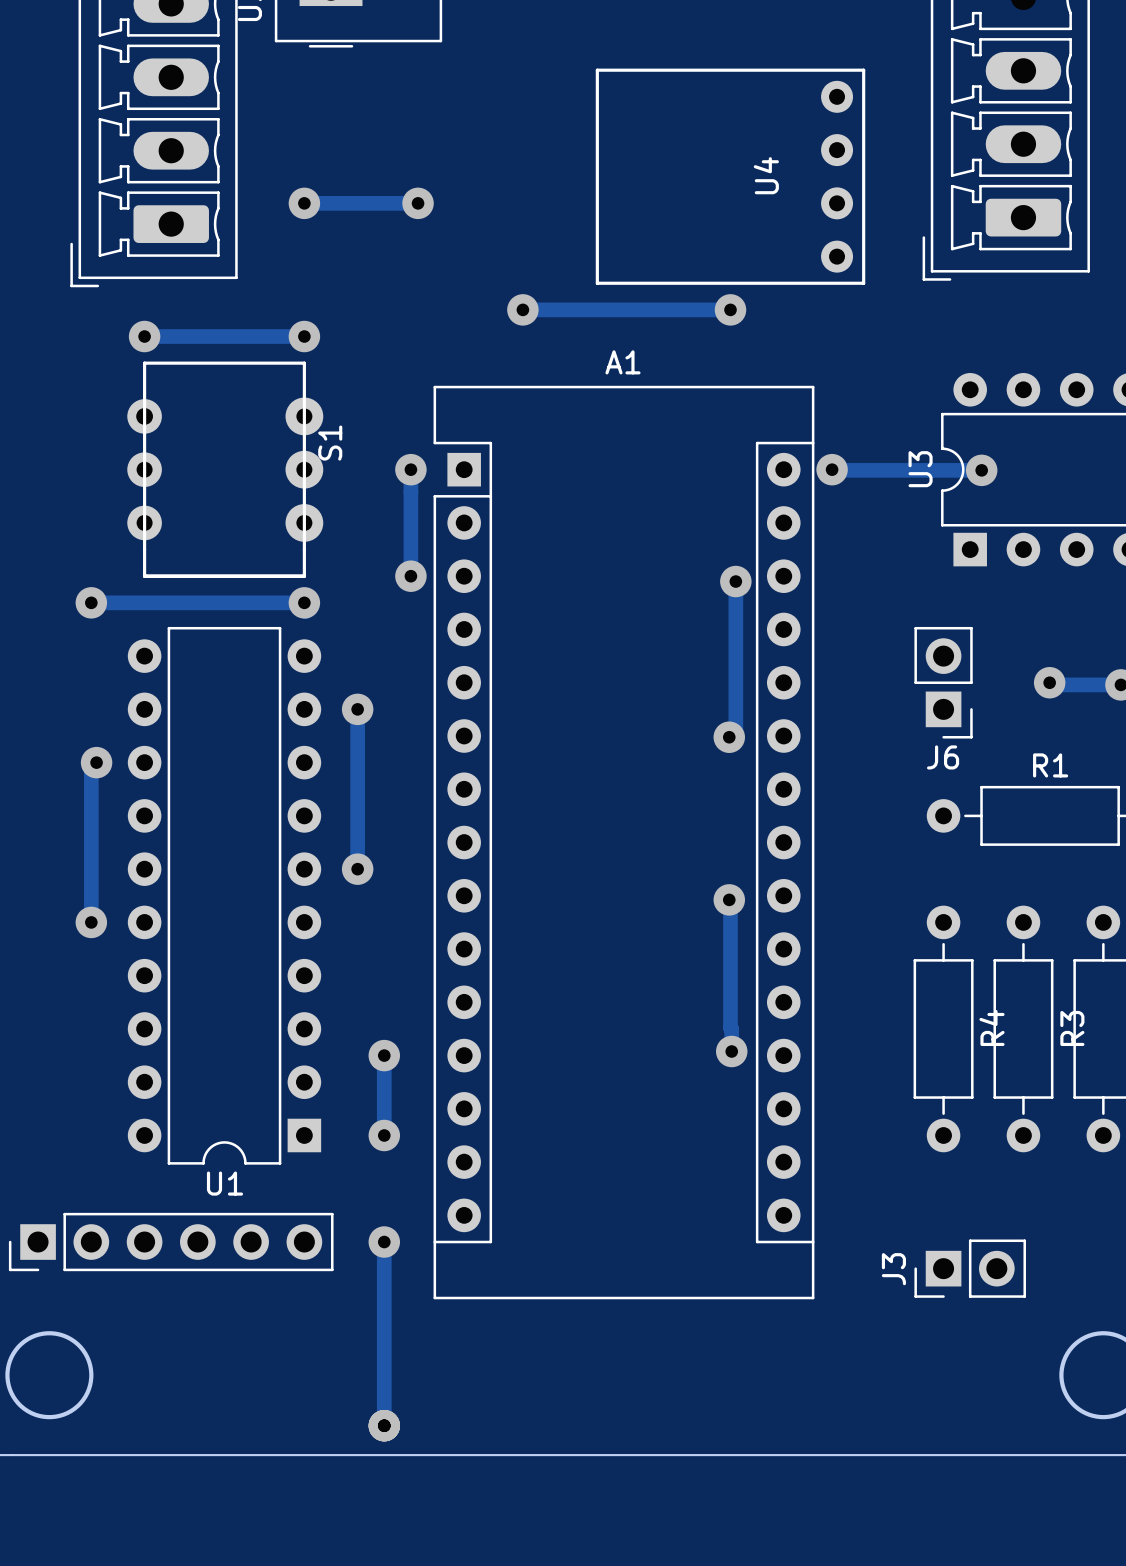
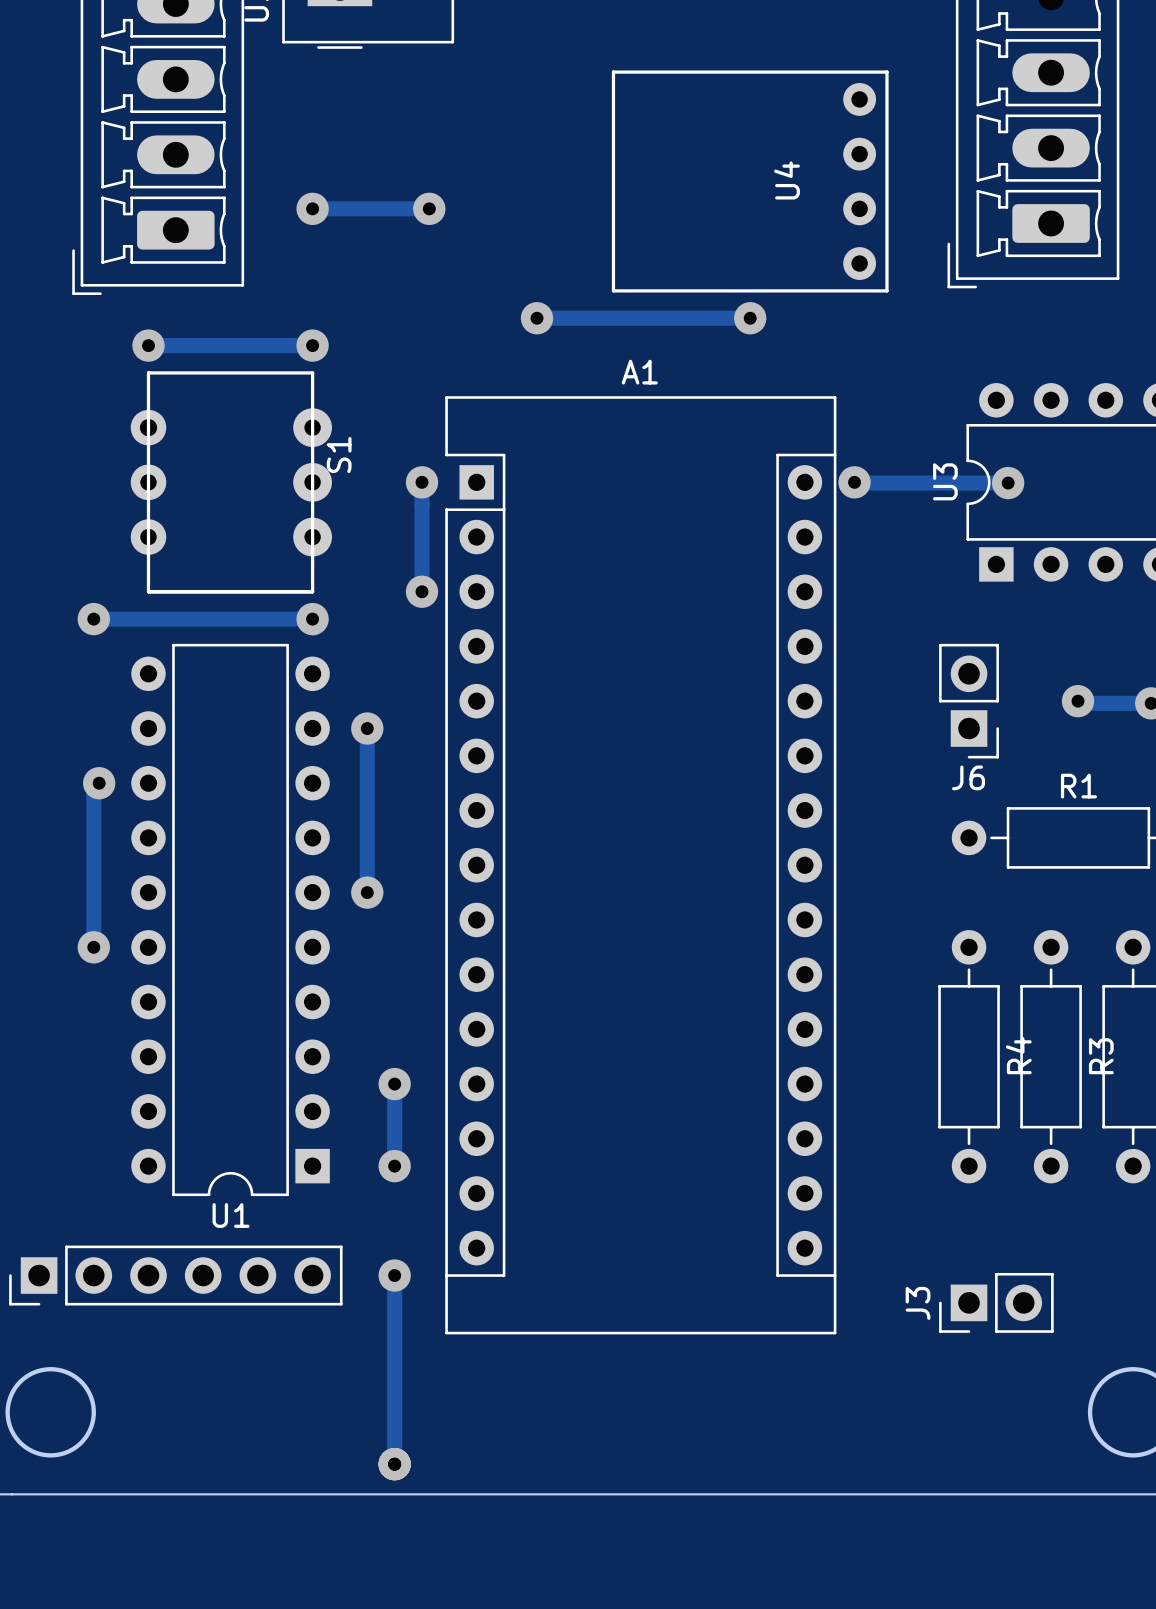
track: (735, 581) (735, 730) (729, 737) -> none
via: (735, 581) -> none
via: (729, 737) -> none
track: (729, 899) (731, 1051) -> none
via: (729, 899) -> none
via: (731, 1051) -> none

